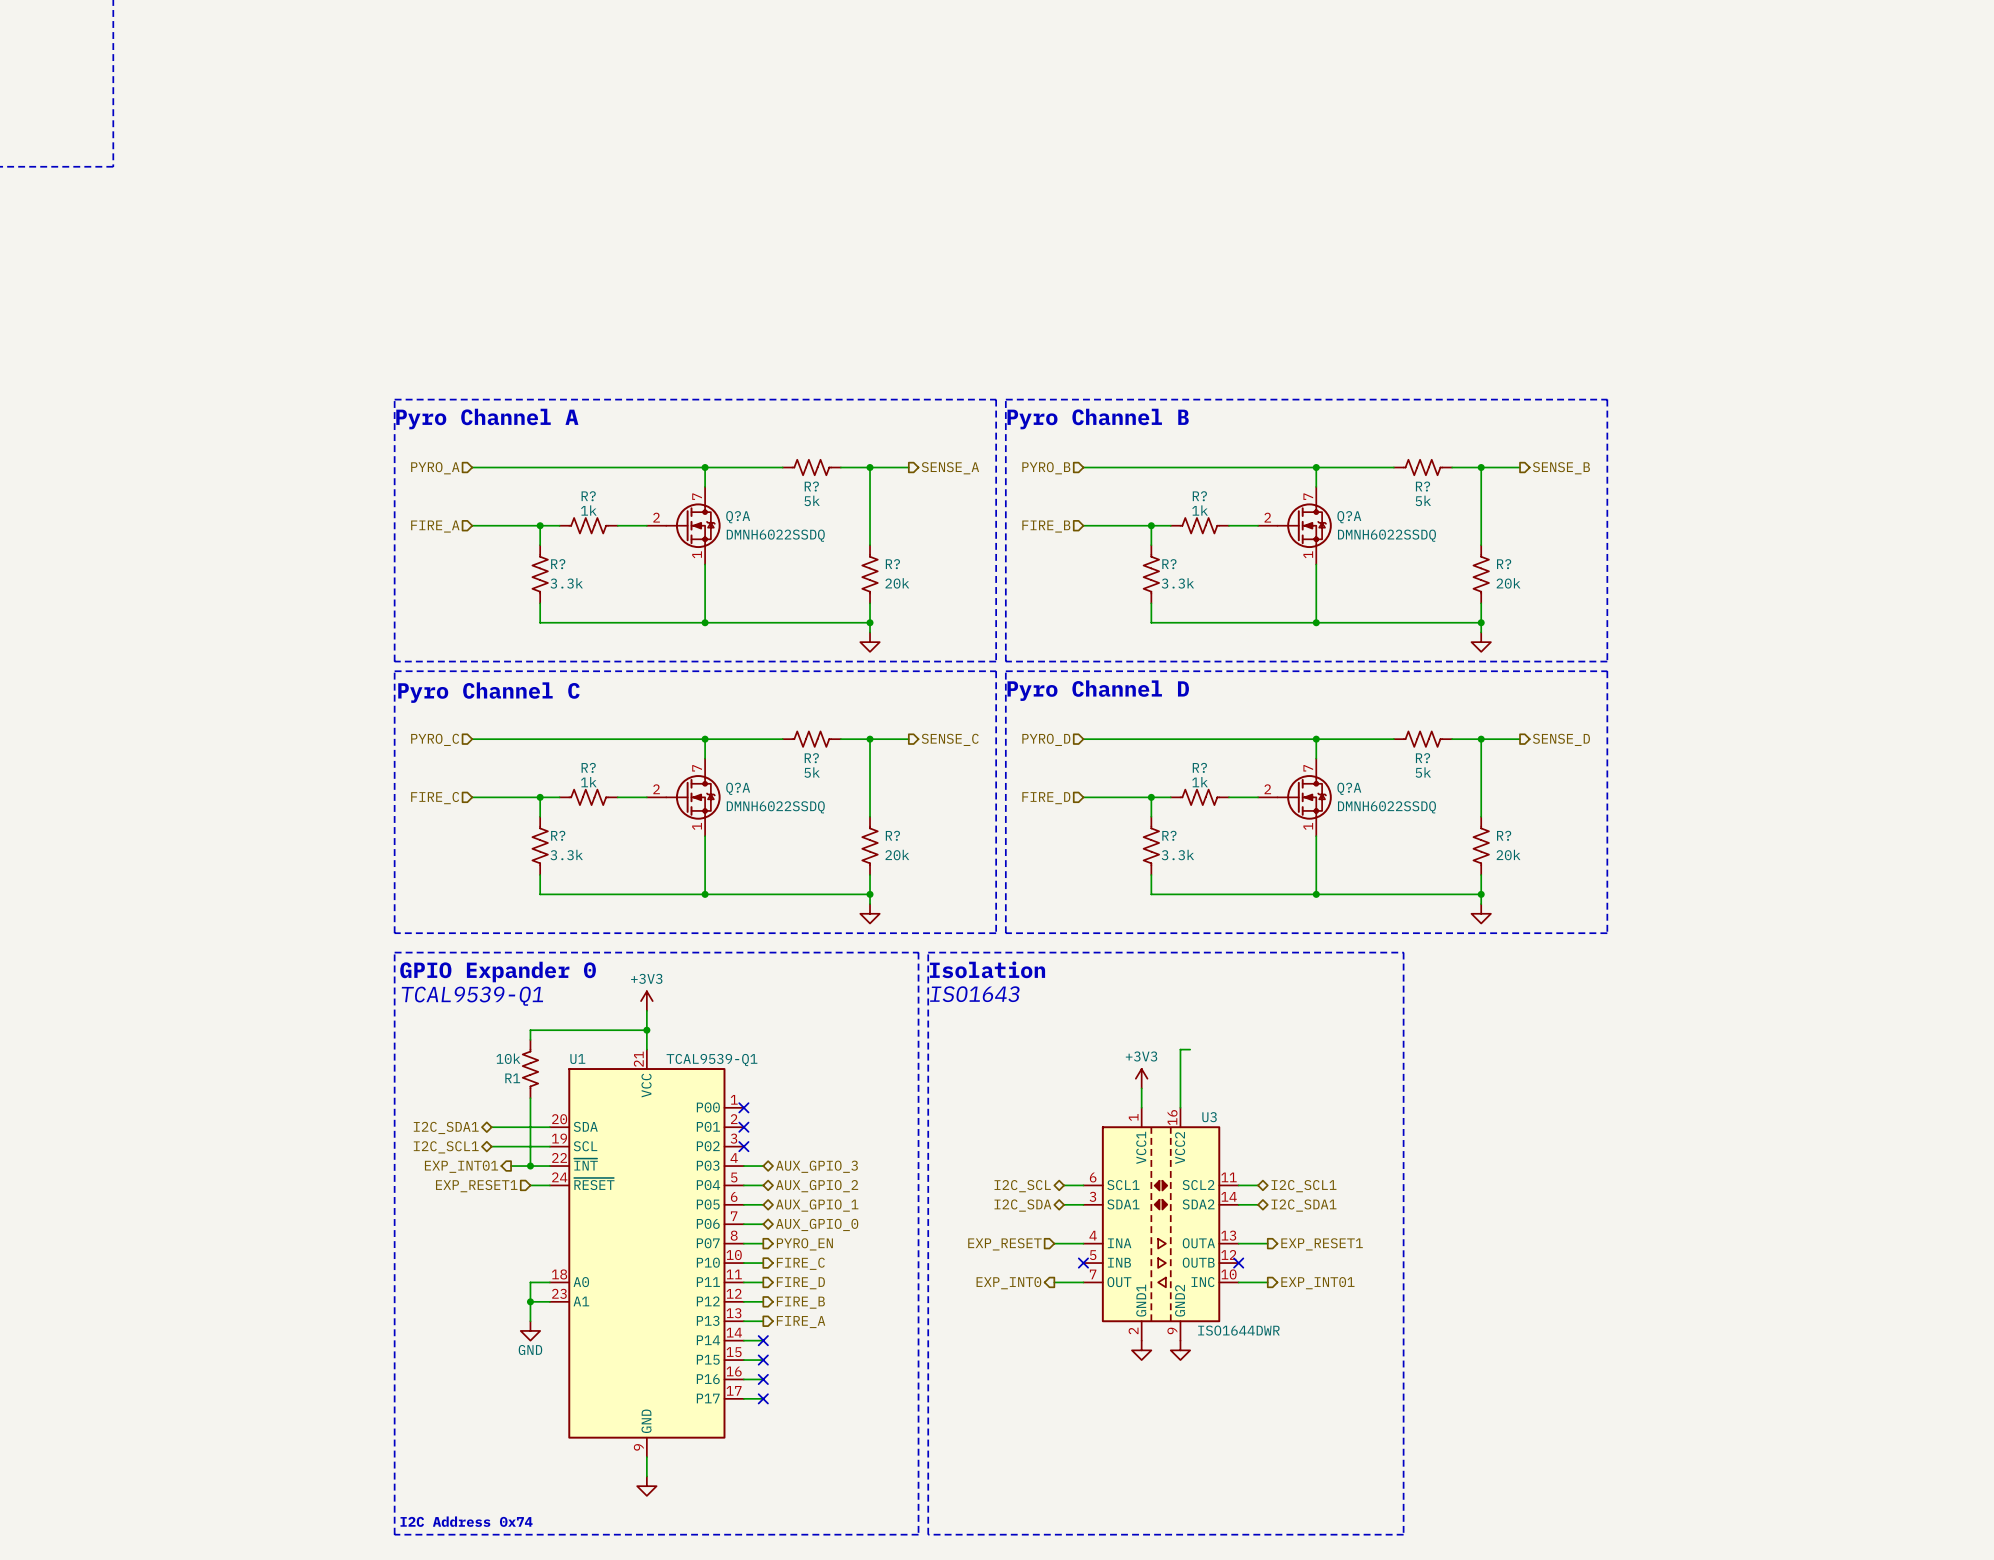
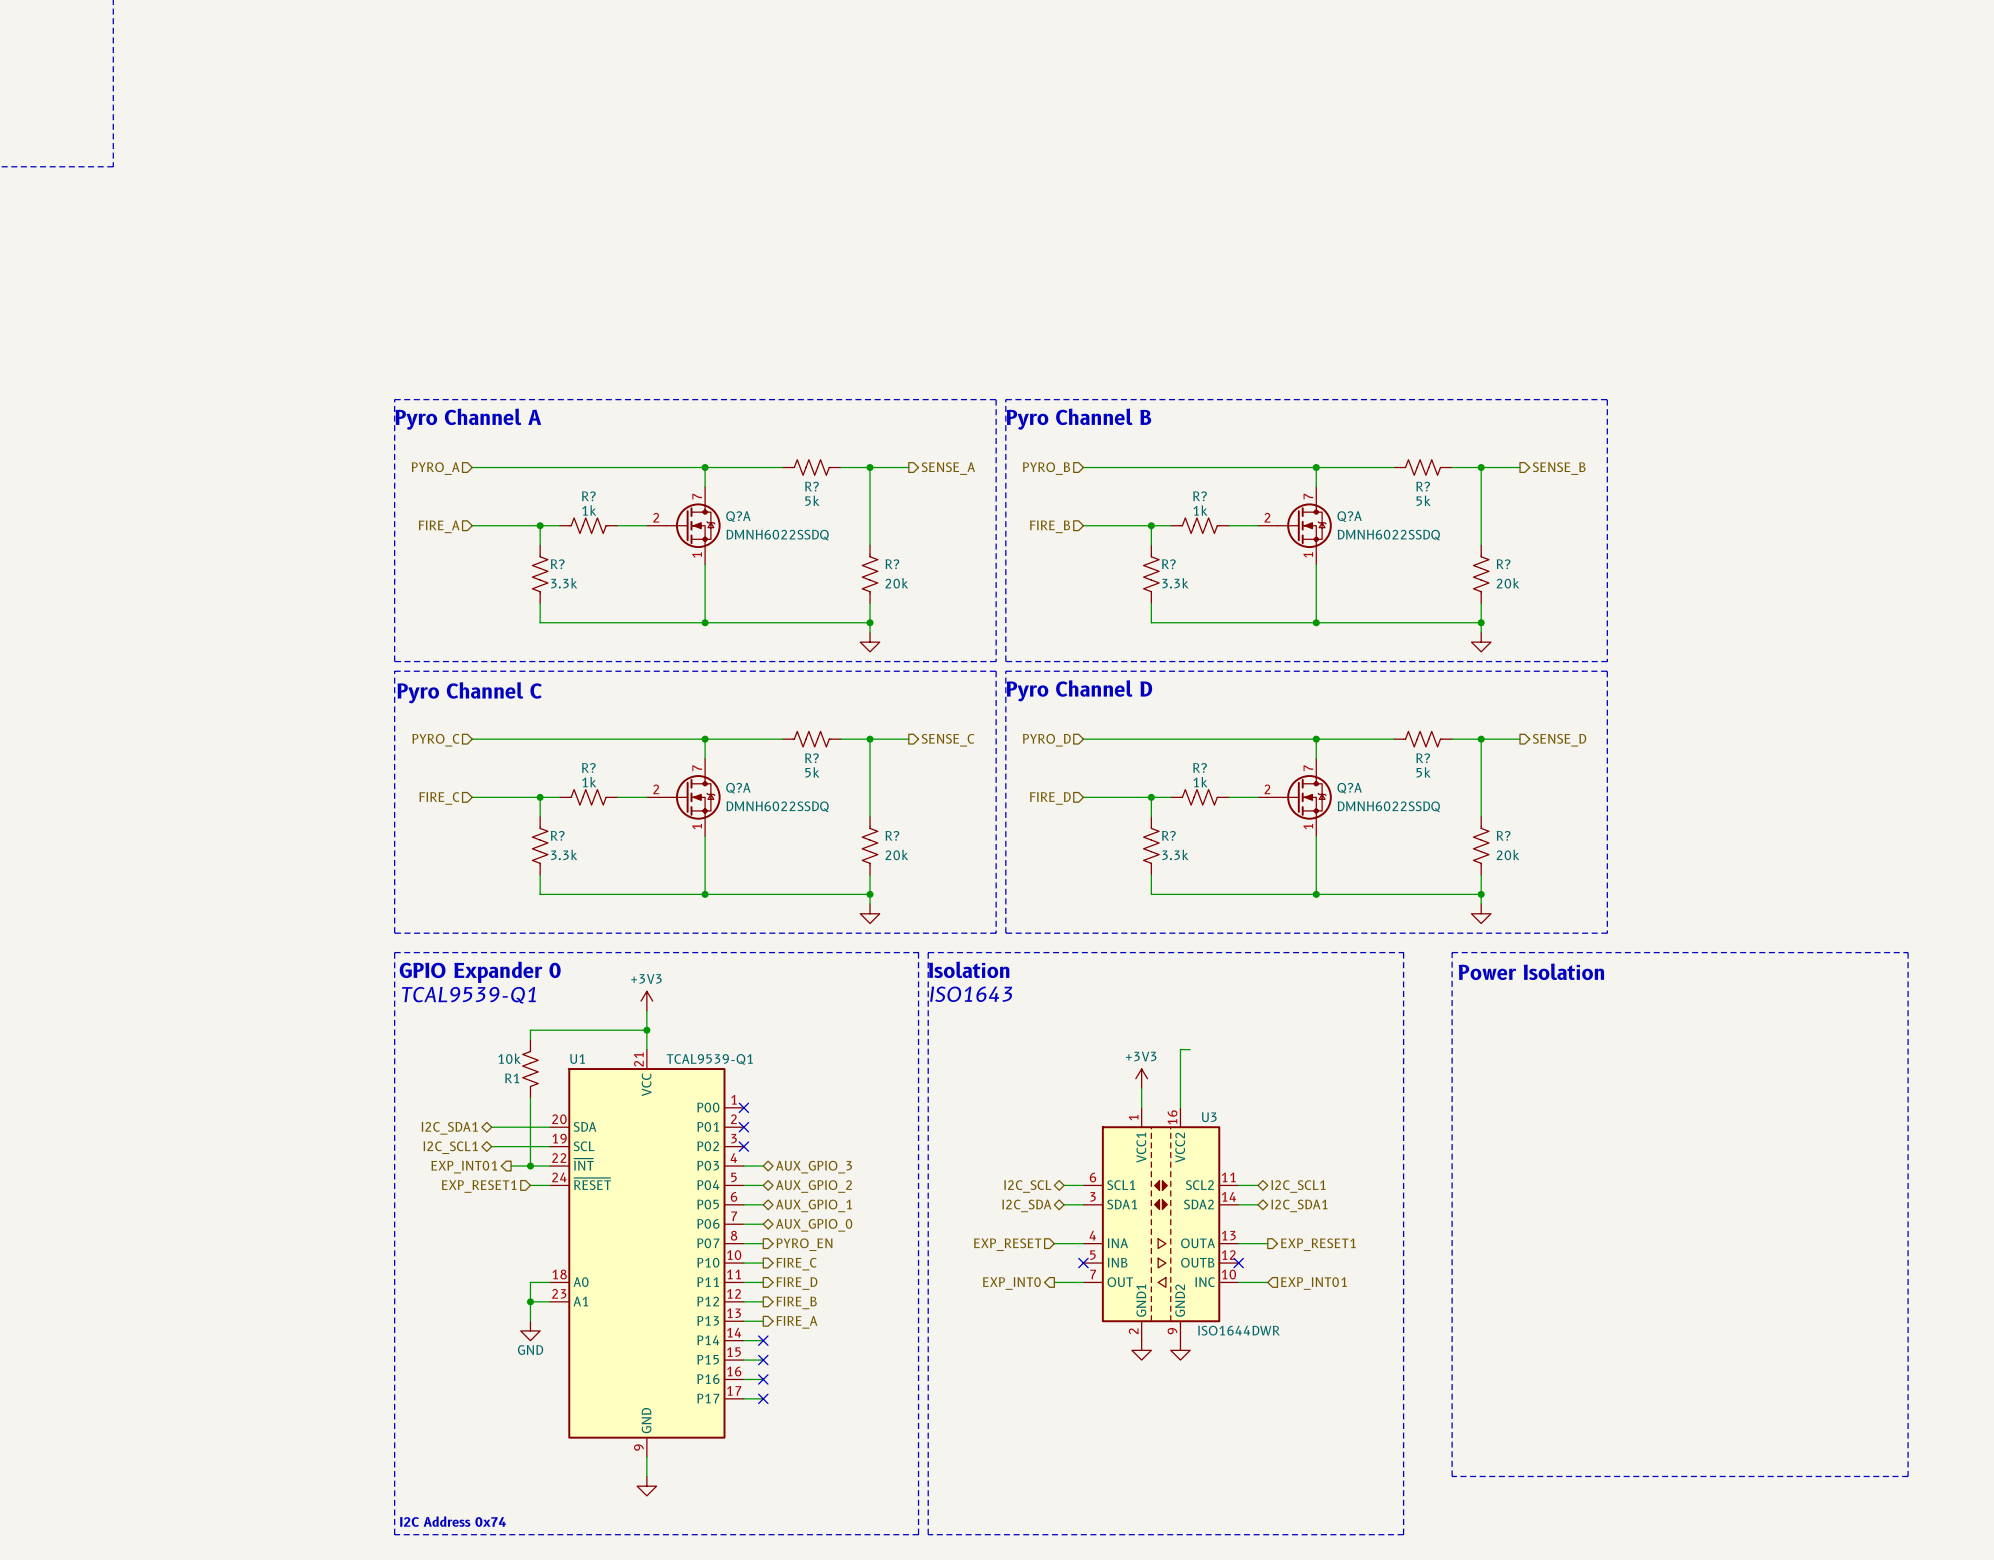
line: none -> (1452, 952) (1908, 952) (1908, 1476) (1452, 1476) (1452, 952)
text: none -> Power Isolation (1531, 971)
hierarchical label shape: output (1317, 1283) -> input (1313, 1283)

